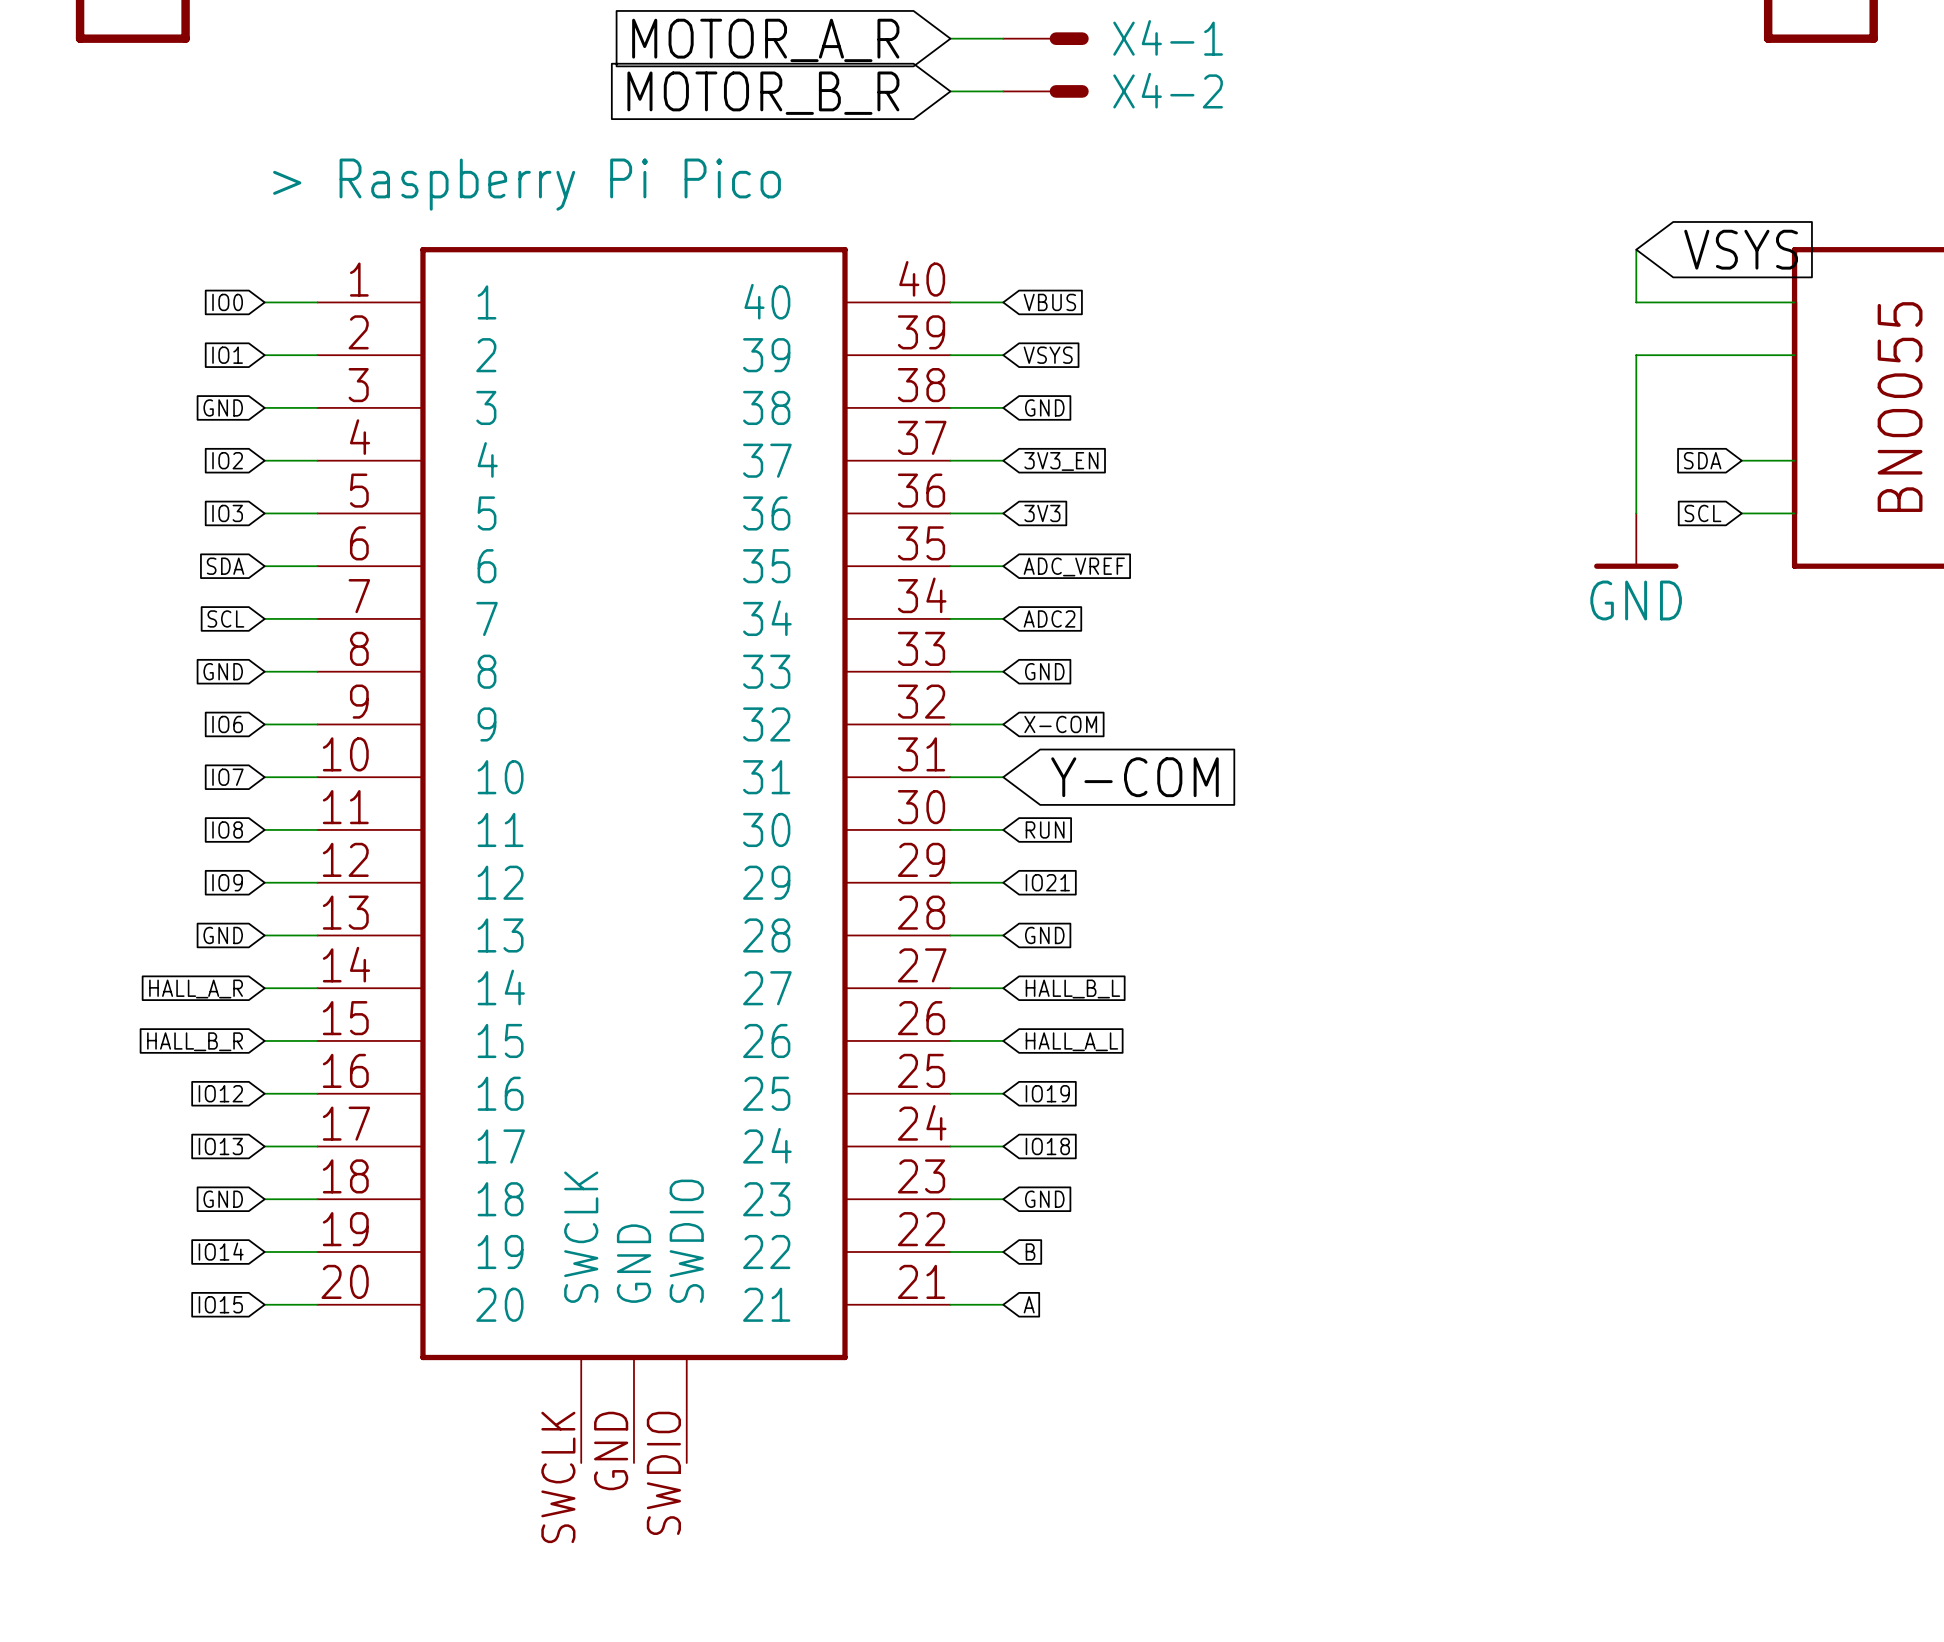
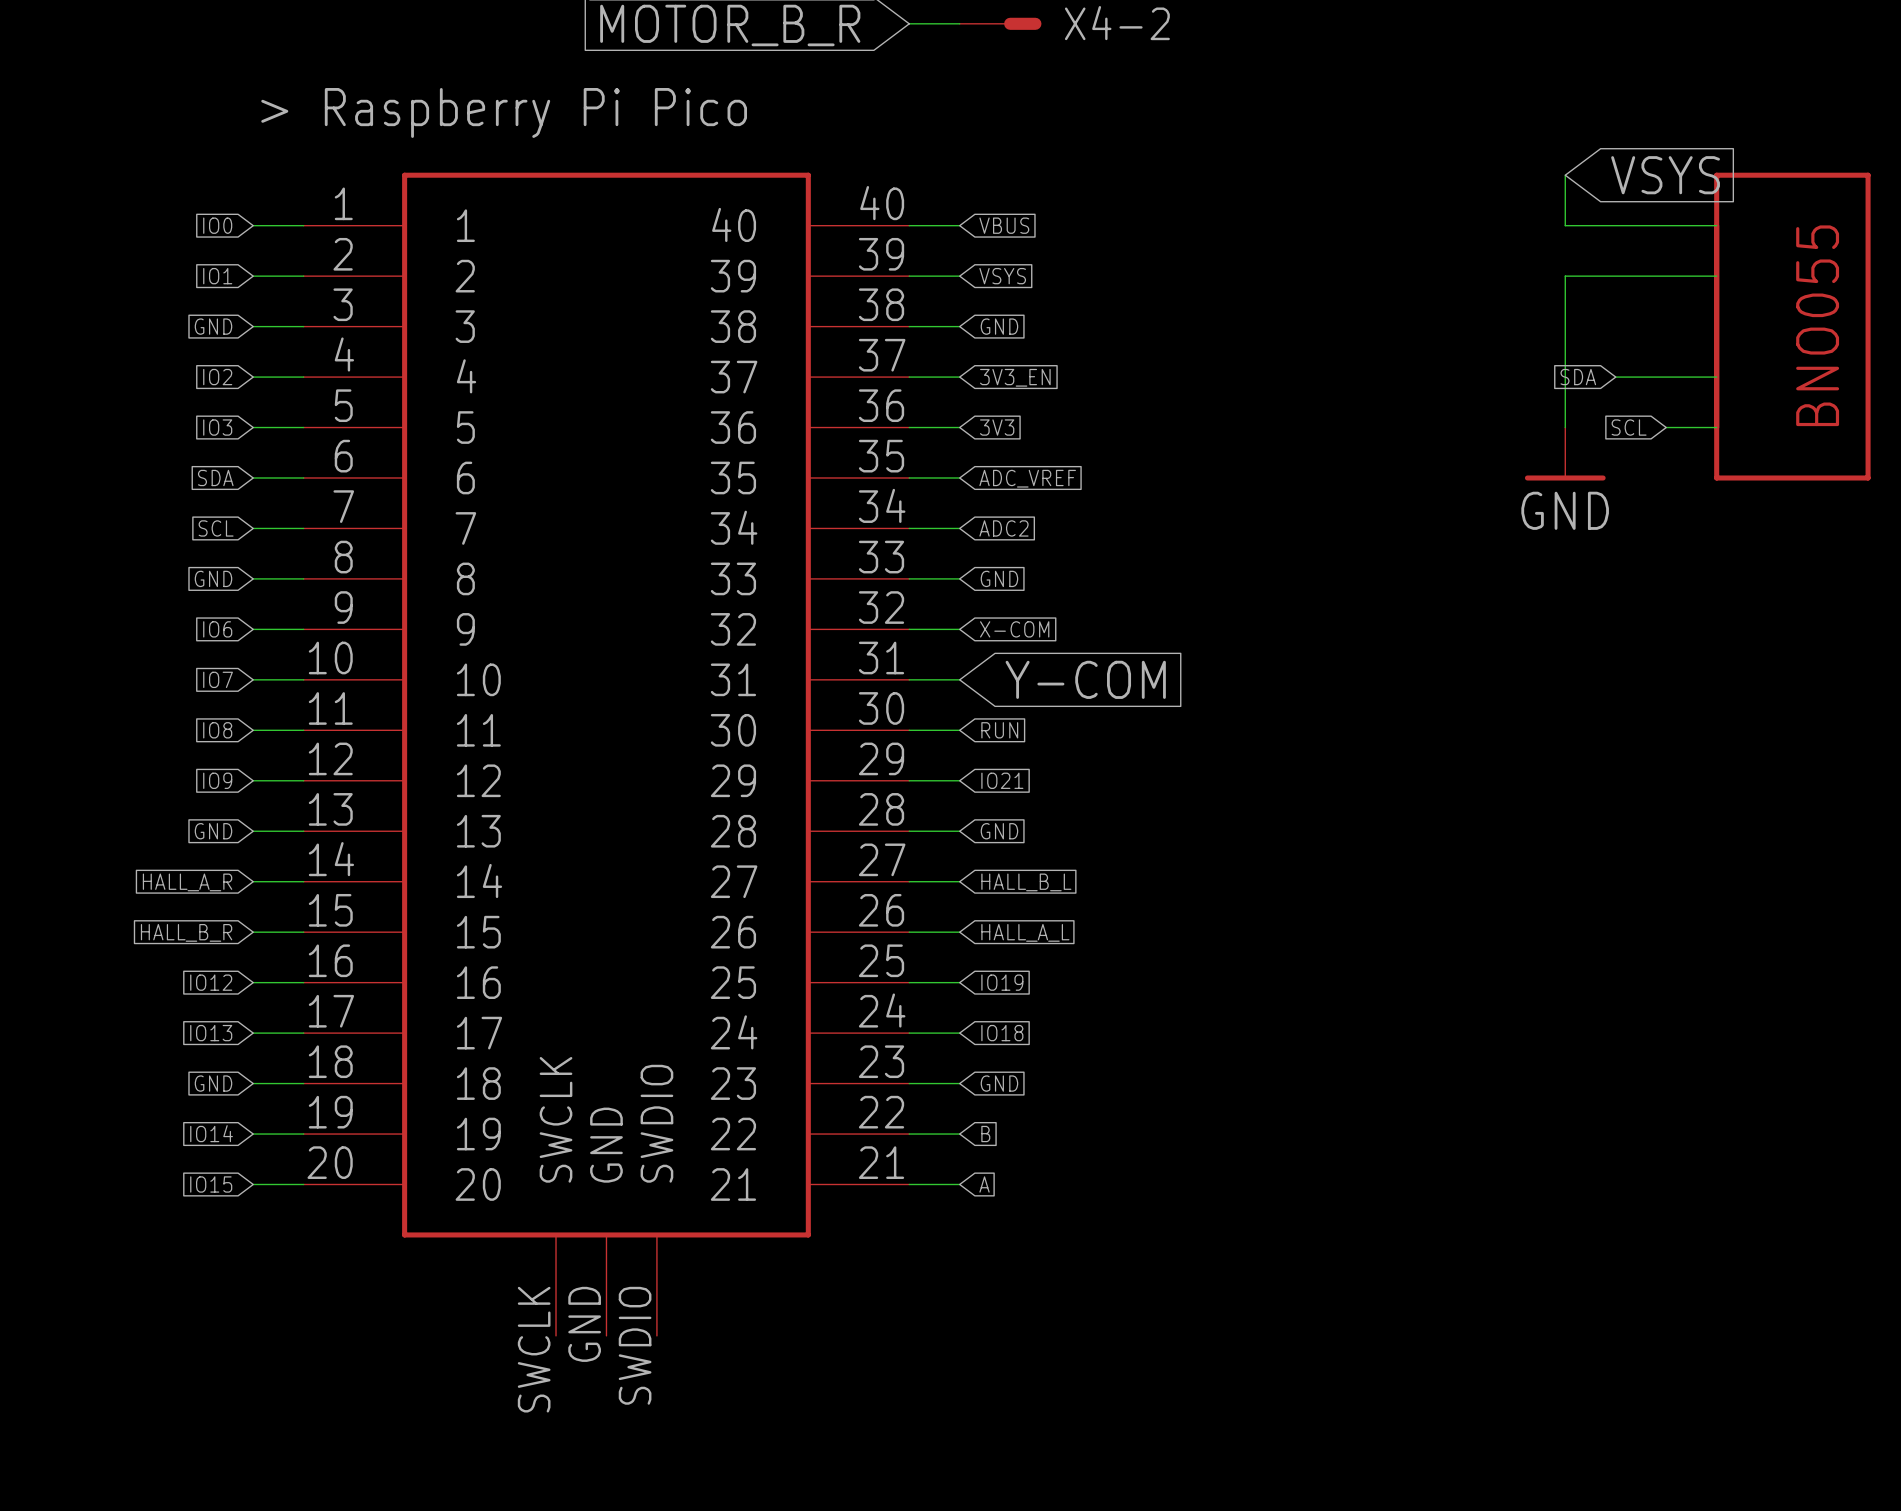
wire: none -> (1615, 377) (1666, 377)
global label position: SDA (1702, 460) -> SDA (1578, 377)

